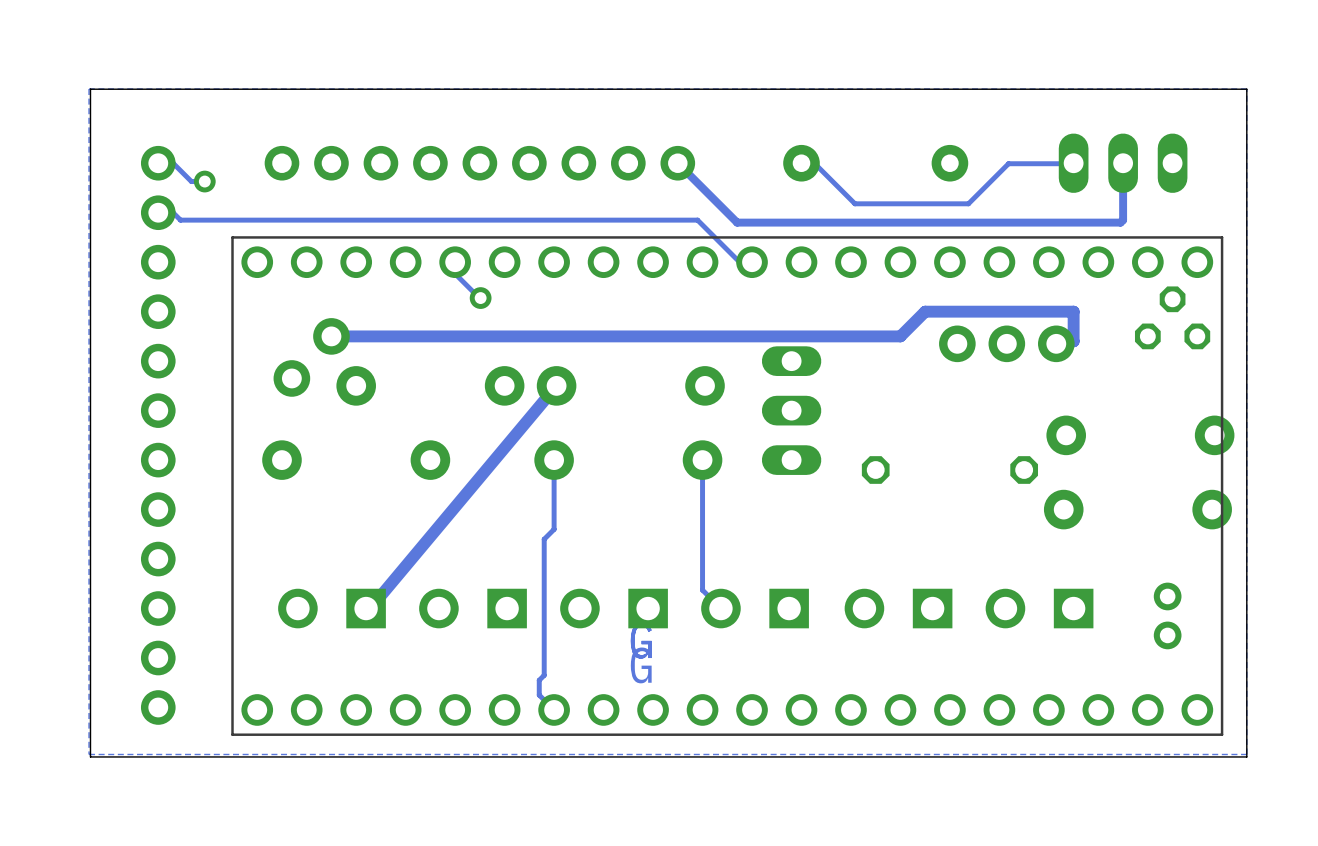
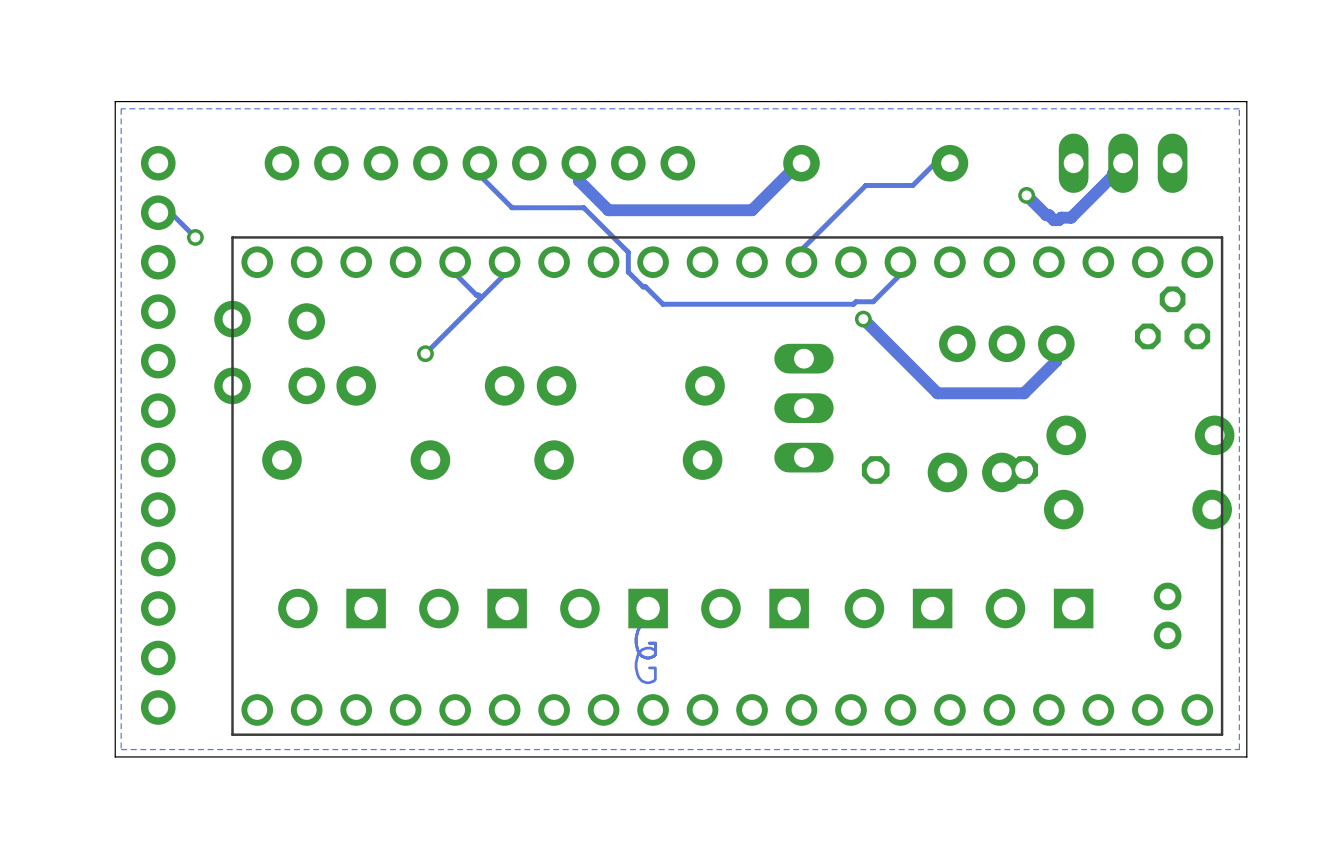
zone outline: (1246, 89) (89, 89) (89, 754) (1246, 754) (1246, 89) -> (1239, 108) (1239, 749) (121, 749) (121, 108) (1239, 108)
board edge: (1246, 101) (1246, 89) (90, 89) (90, 756) (115, 756) -> (1246, 101) (115, 101) (115, 756)
track: (158, 163) (173, 163) (191, 181) (204, 181) -> none
track: none -> (479, 163) (479, 175) (512, 207) (583, 207) (628, 252) (628, 272) (662, 304) (853, 304) (855, 301) (873, 301) (900, 274) (900, 262)
track: none -> (949, 163) (935, 163) (912, 185) (865, 185) (801, 249) (801, 262)
track: (1073, 163) (1008, 163) (968, 203) (854, 203) (814, 163) (801, 163) -> (578, 163) (581, 165) (581, 175) (578, 180) (608, 210) (752, 210) (801, 163)
track: (1123, 163) (1123, 220) (1120, 222) (737, 222) (677, 163) -> (1123, 163) (1071, 217) (1053, 220) (1026, 195)
via: (204, 181) -> none
via: none -> (1026, 195)
track: (170, 212) (180, 220) (697, 220) (739, 262) (752, 262) -> (170, 212) (195, 237)
via: none -> (195, 237)
track: none -> (504, 262) (504, 274) (425, 353)
via: (480, 298) -> none
part: none -> (232, 319)
via: none -> (863, 319)
track: (331, 336) (900, 336) (925, 311) (1073, 311) (1073, 341) (1056, 343) -> (863, 319) (937, 393) (1024, 393) (1056, 361) (1056, 343)
part position: (331, 336) -> (306, 321)
via: none -> (425, 353)
part position: (291, 378) -> (306, 385)
part: none -> (232, 385)
track: (556, 385) (378, 598) (366, 608) -> none
part position: (791, 410) -> (803, 408)
track: (554, 460) (554, 529) (544, 539) (544, 675) (539, 680) (539, 695) (554, 709) -> none
track: (702, 460) (702, 590) (720, 608) -> none
part: none -> (974, 472)

